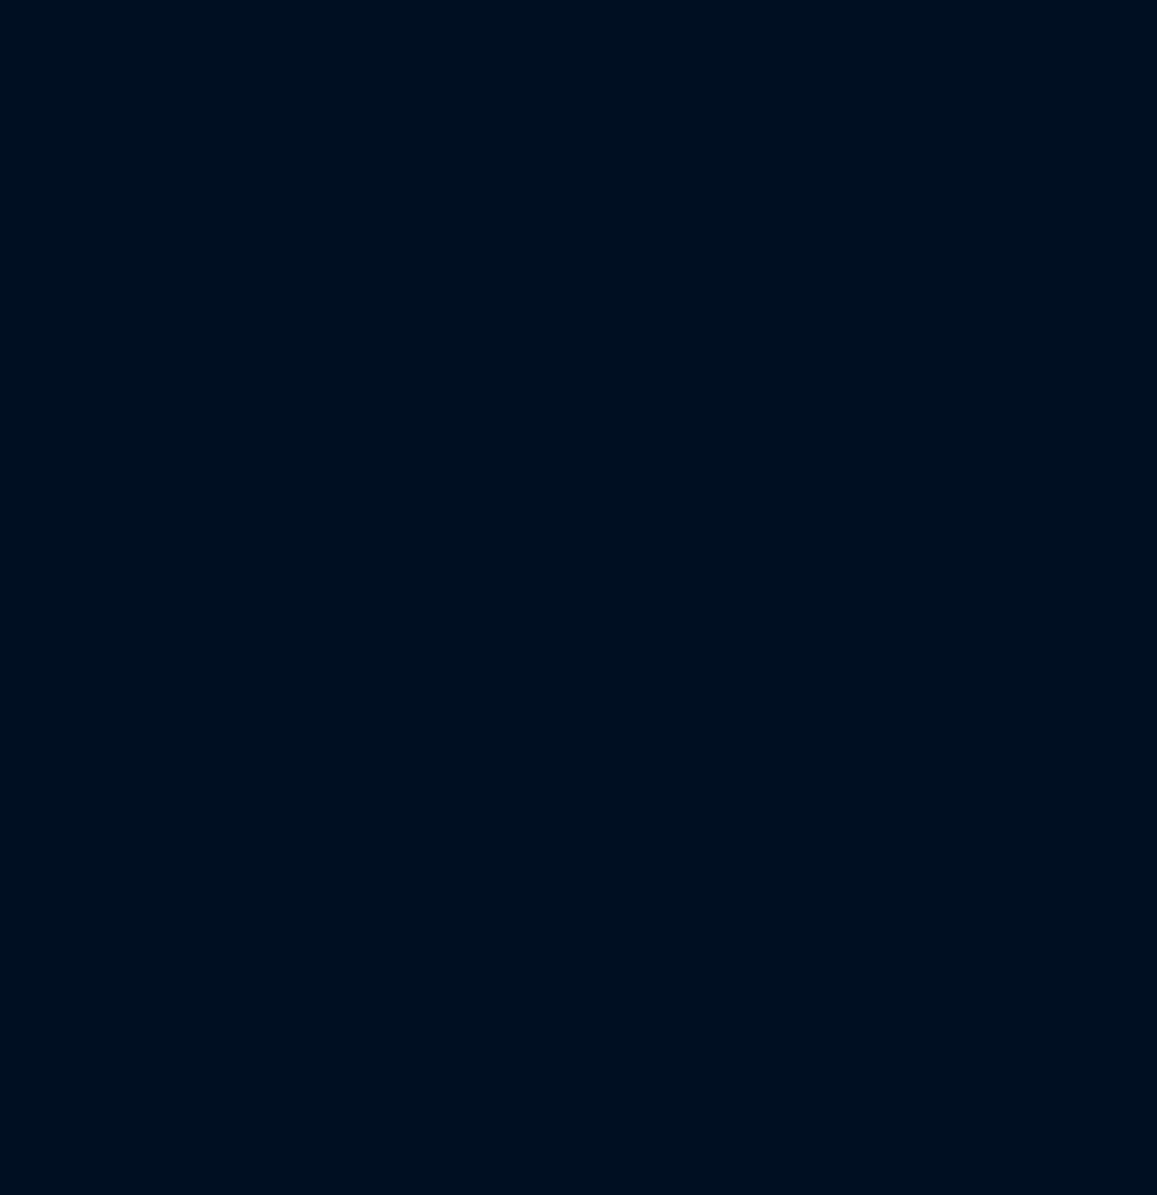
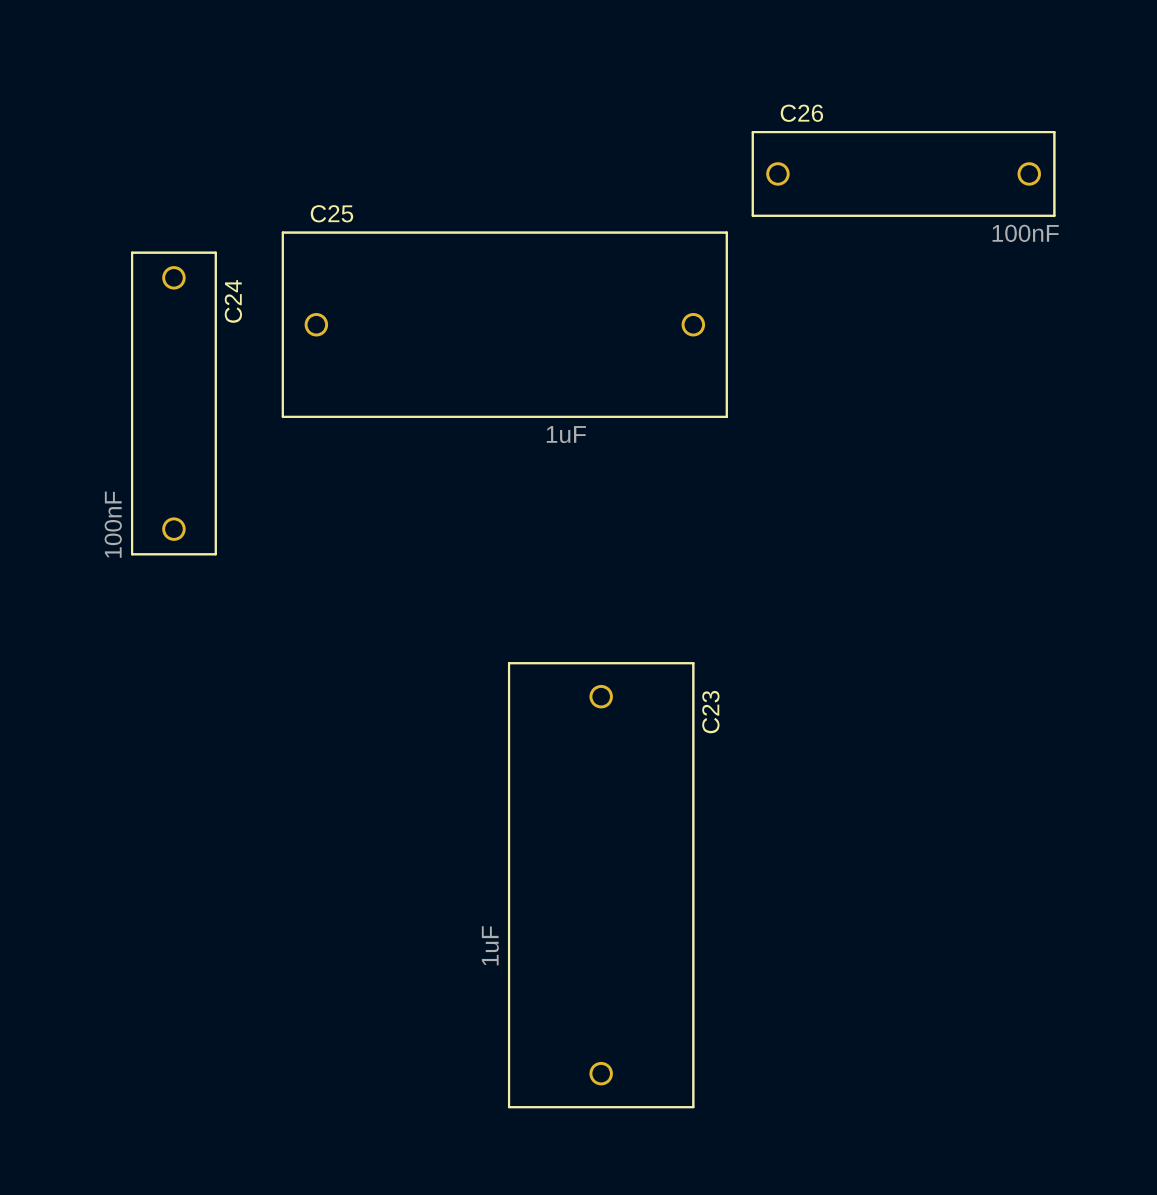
C26: none -> 100nF (903, 173)
C25: none -> 1uF (504, 324)
C24: none -> 100nF (173, 403)
C23: none -> 1uF (601, 885)

